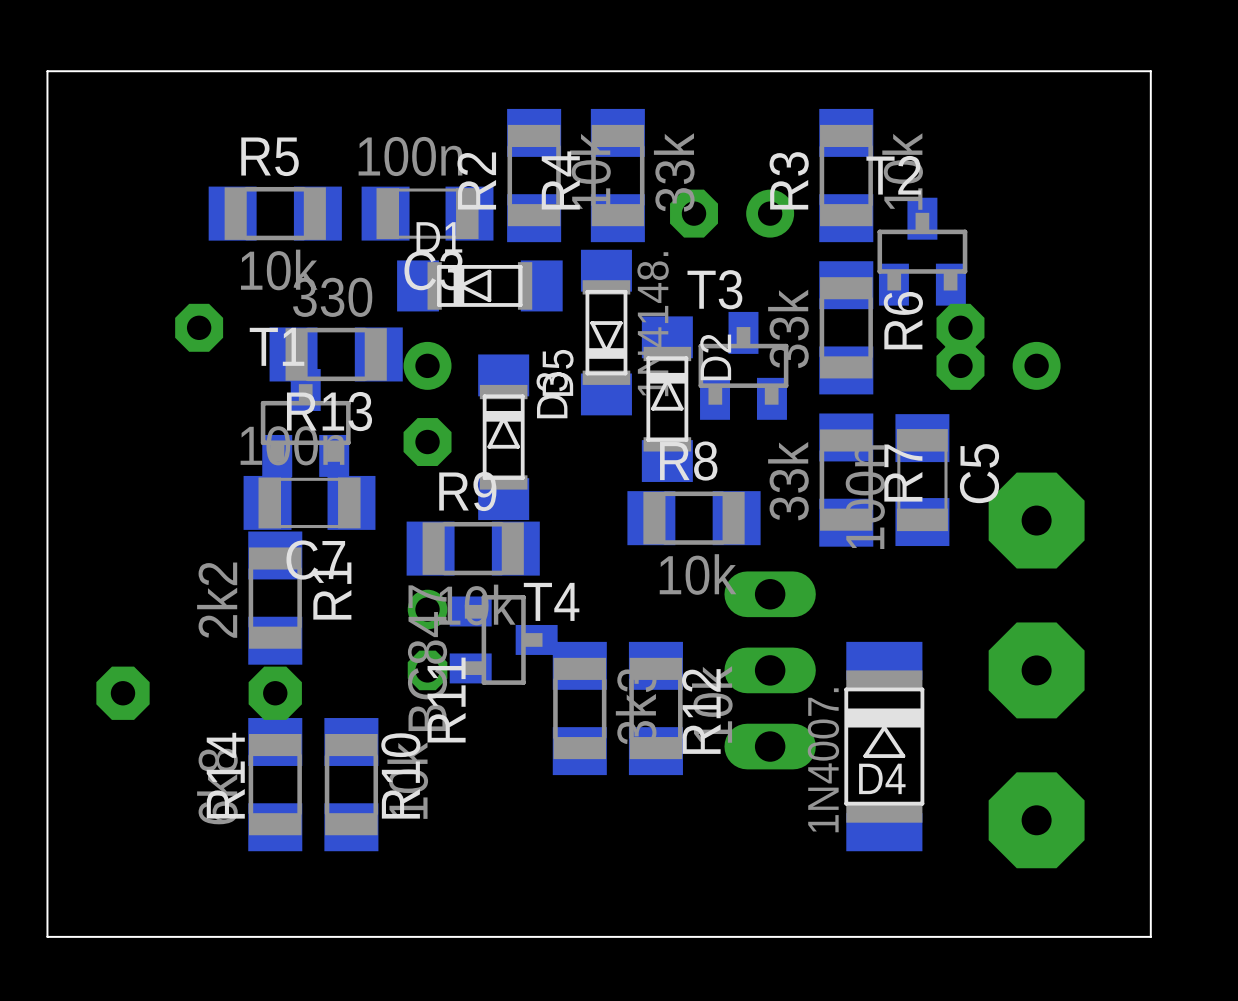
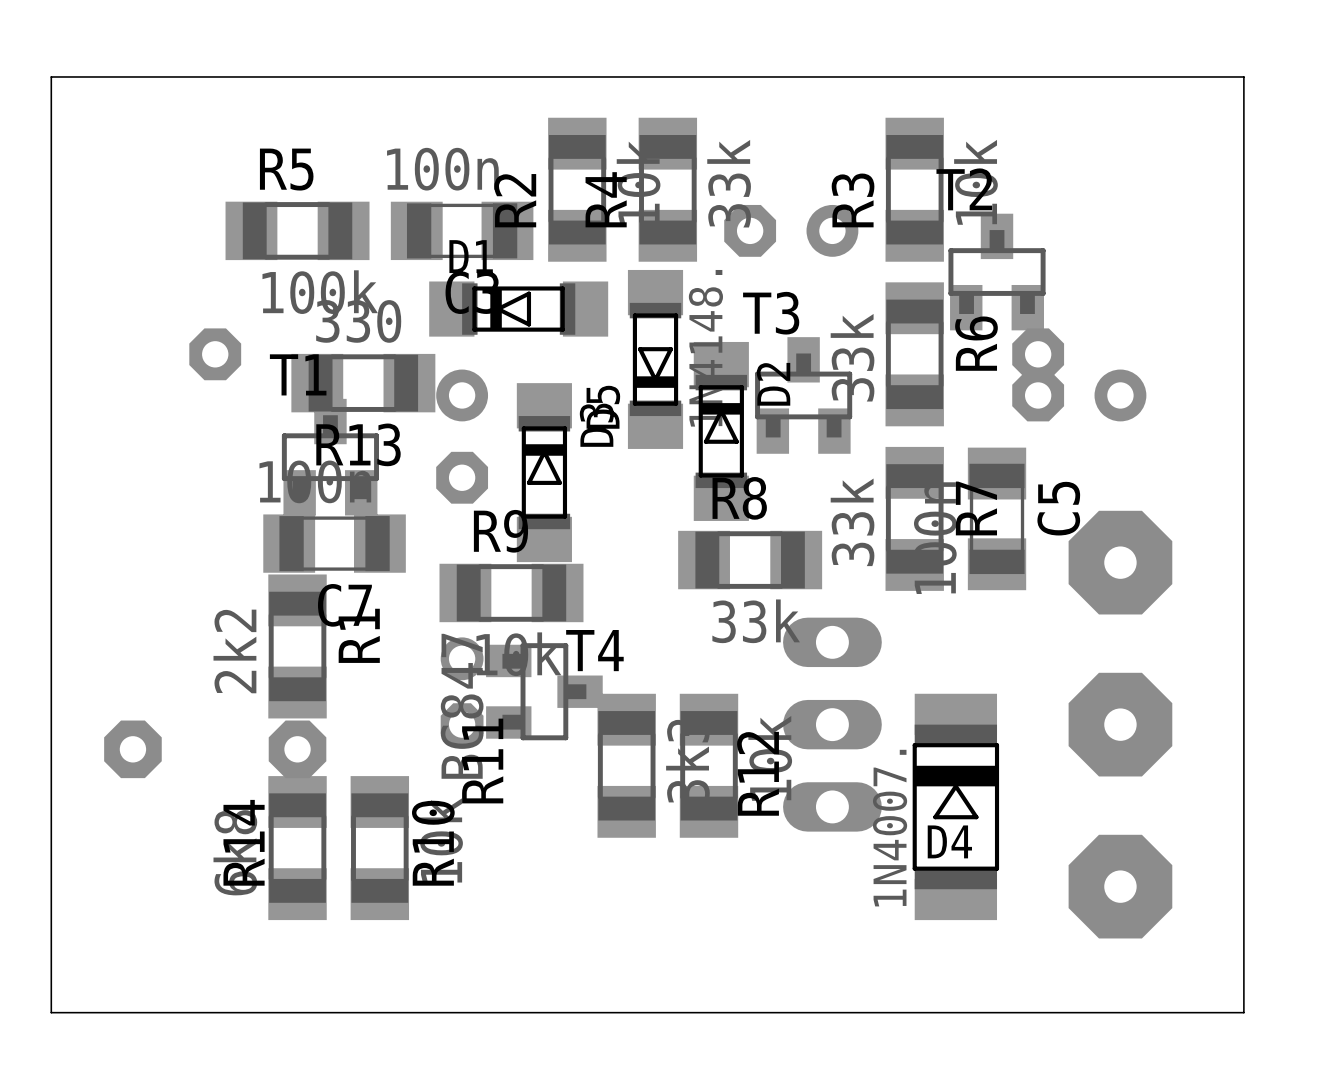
R5 value: 10k (279, 269) -> 100k (320, 292)
R8 value: 10k (698, 574) -> 33k (756, 621)

